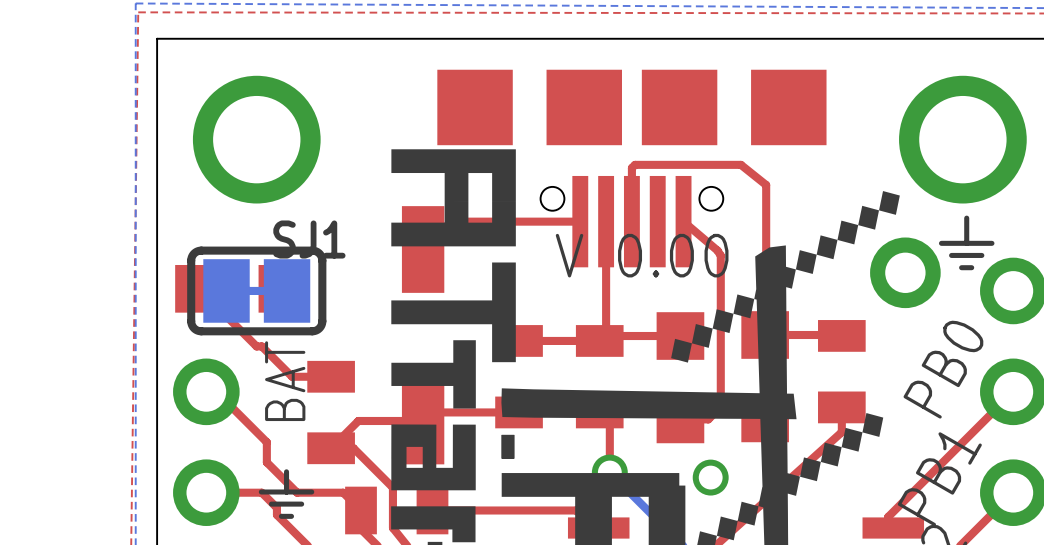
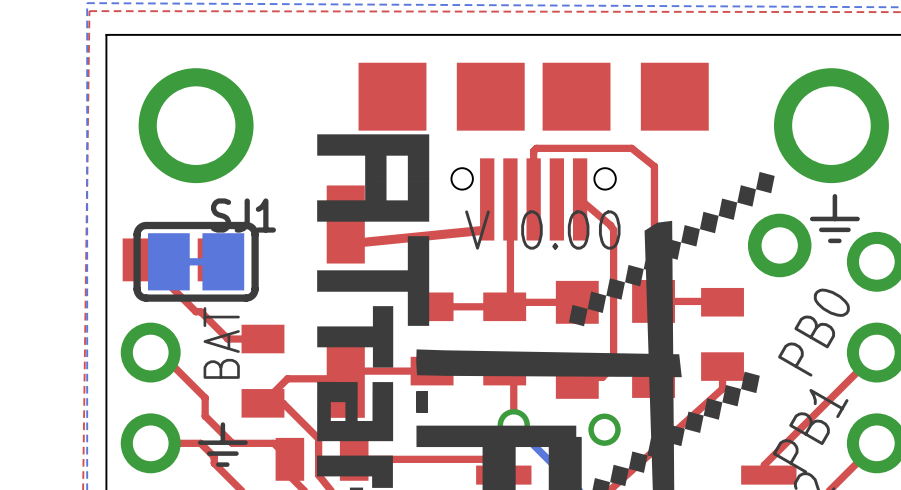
top track: (580, 221) (450, 221) (423, 249) -> (487, 199) (486, 230) (350, 243) (345, 224)

